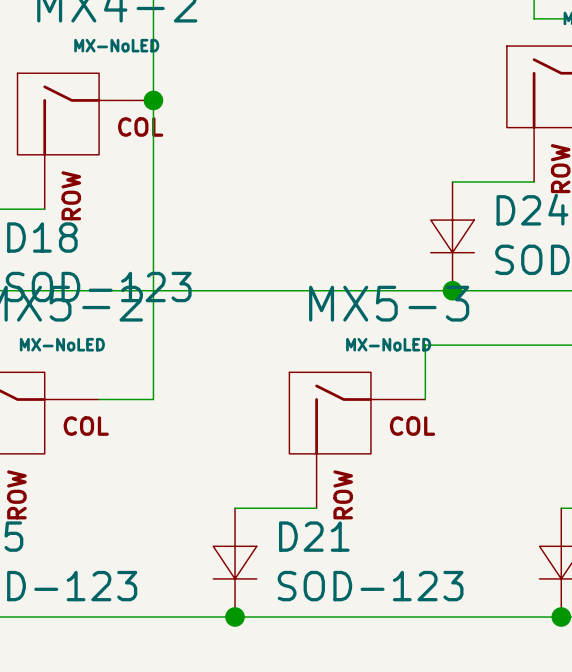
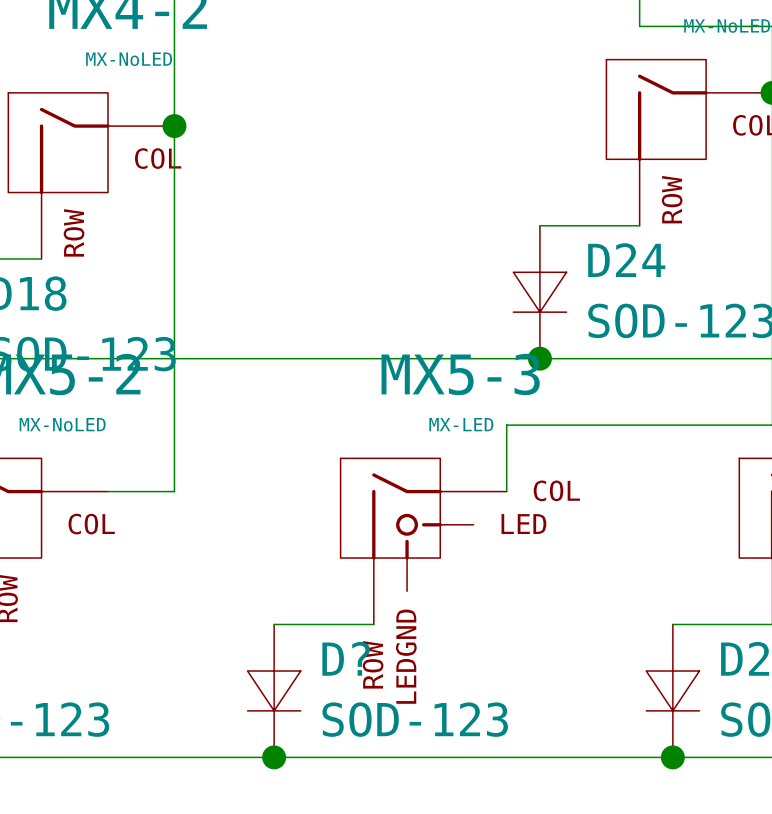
MX5-3 value: MX-NoLED (388, 344) -> MX-LED (461, 424)
MX5-3 symbol: [289, 372, 426, 509] -> [340, 458, 507, 625]
D21 name: D21 (314, 536) -> D? (346, 658)

